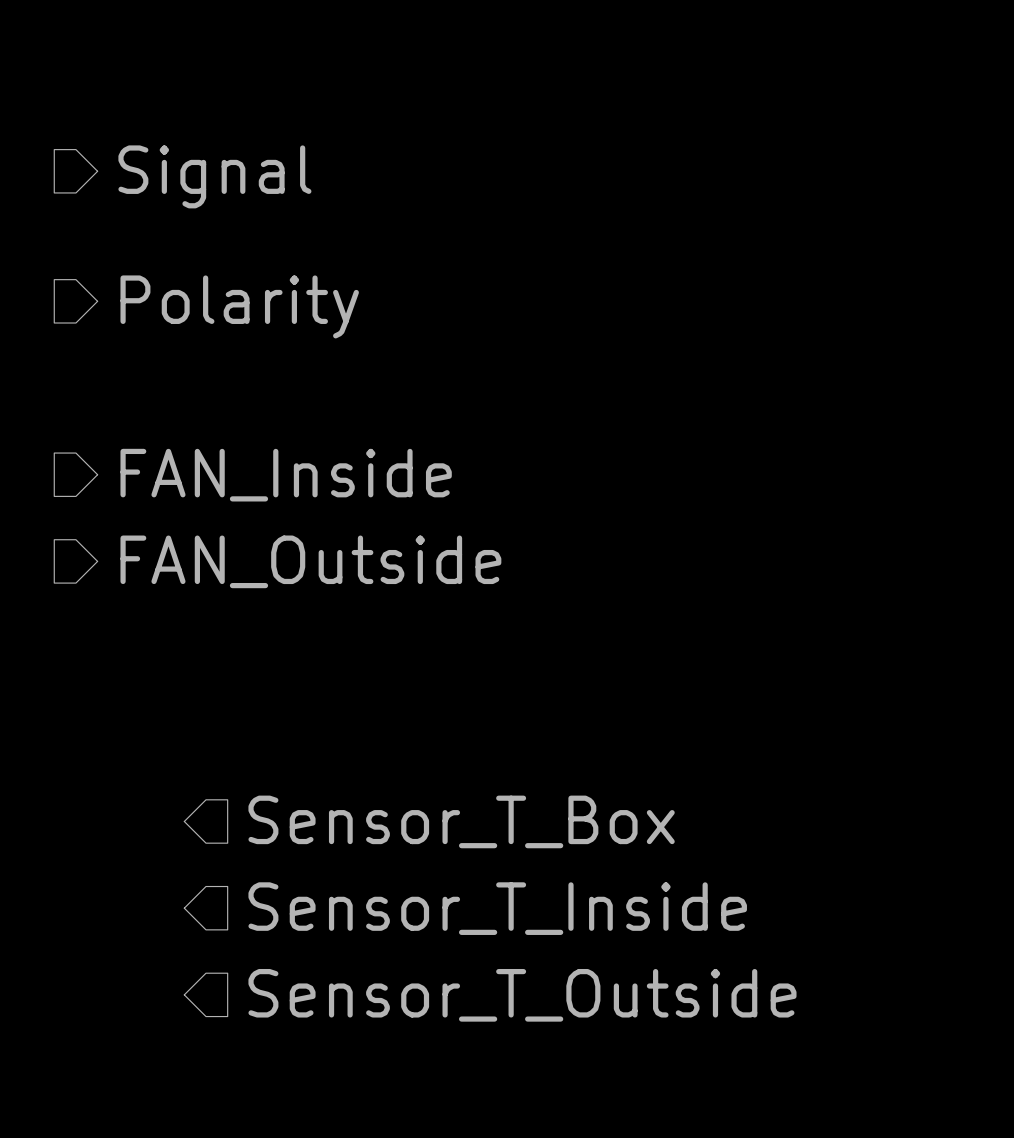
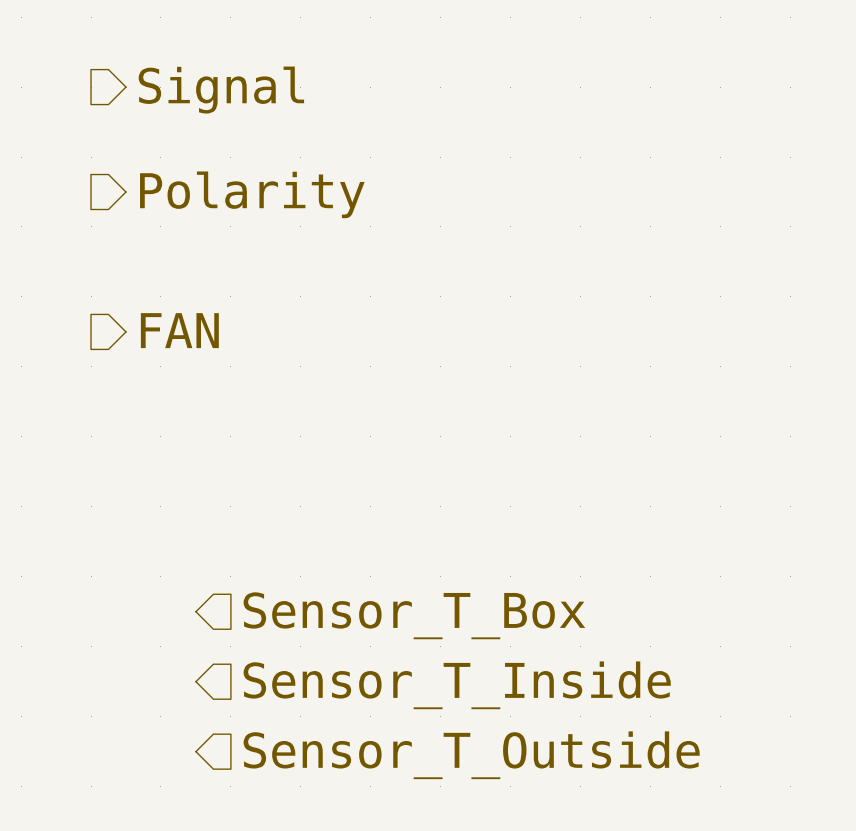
hierarchical label: FAN_Inside (286, 475) -> FAN (179, 330)
hierarchical label: FAN_Outside (310, 561) -> none

